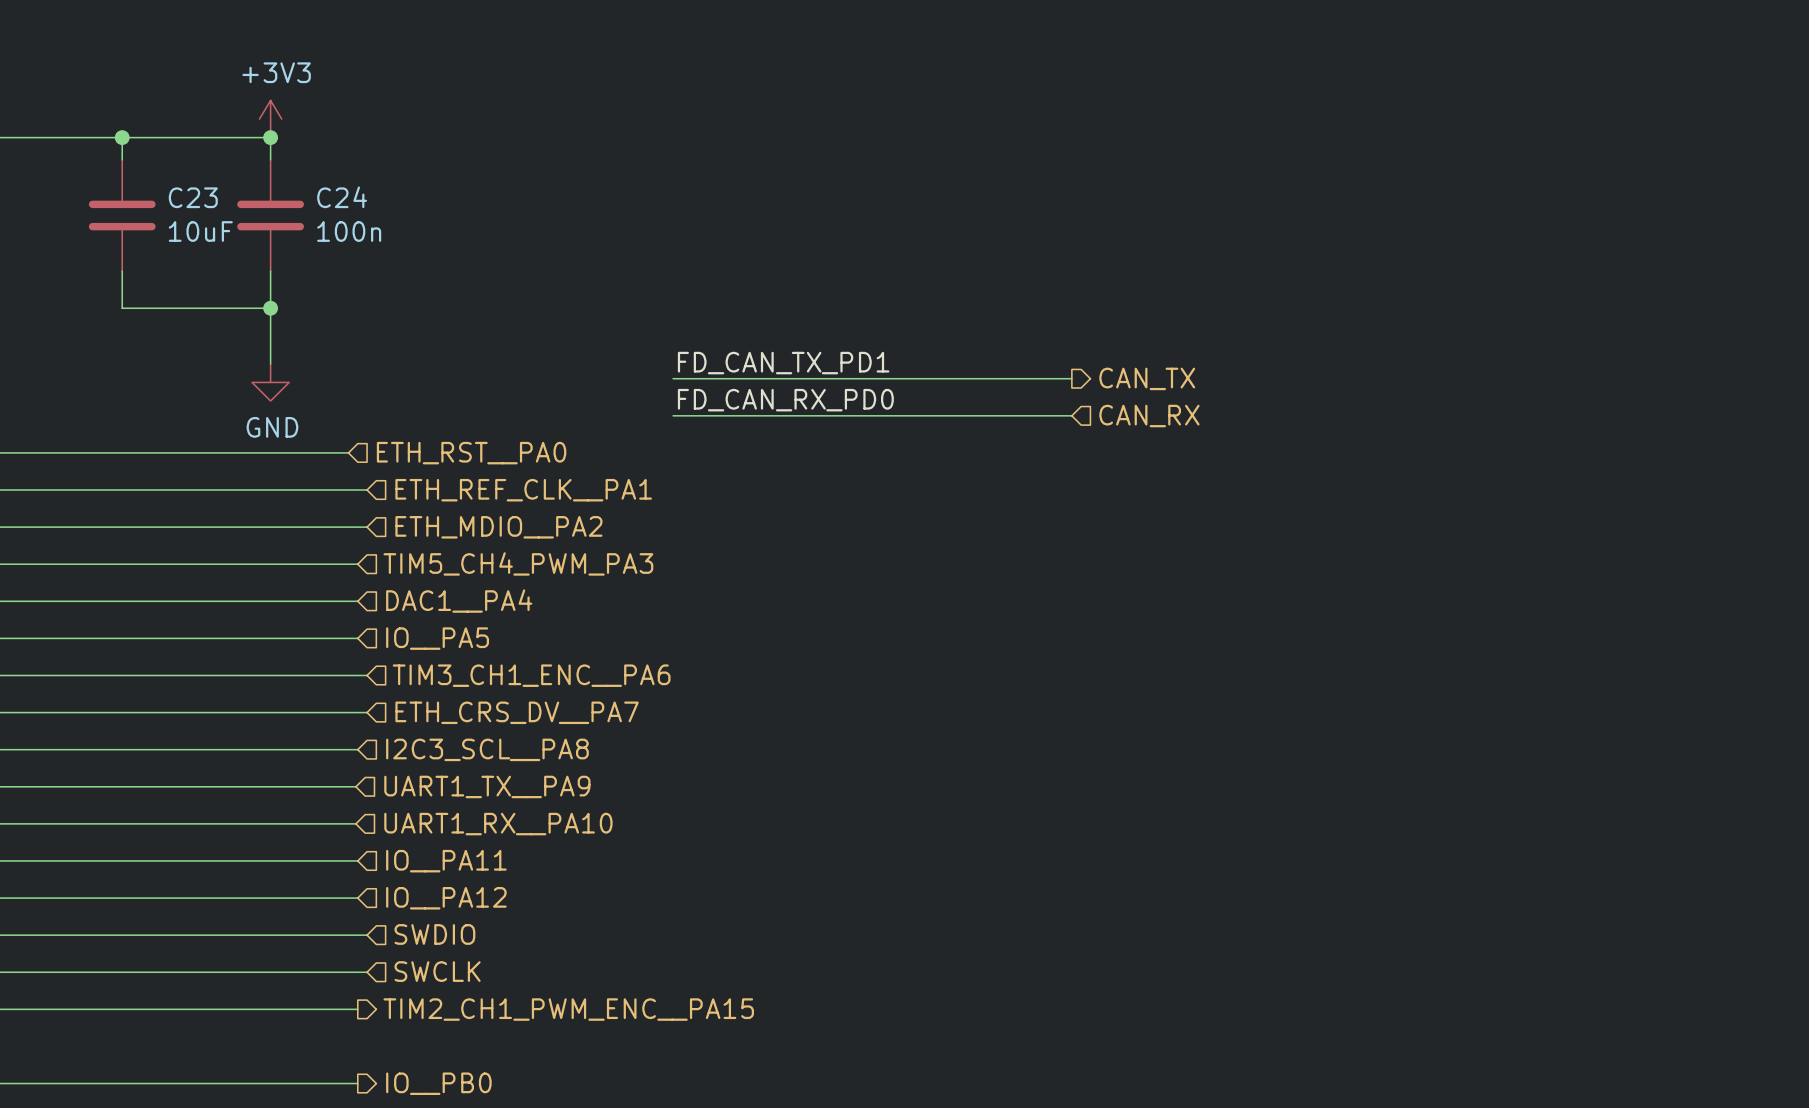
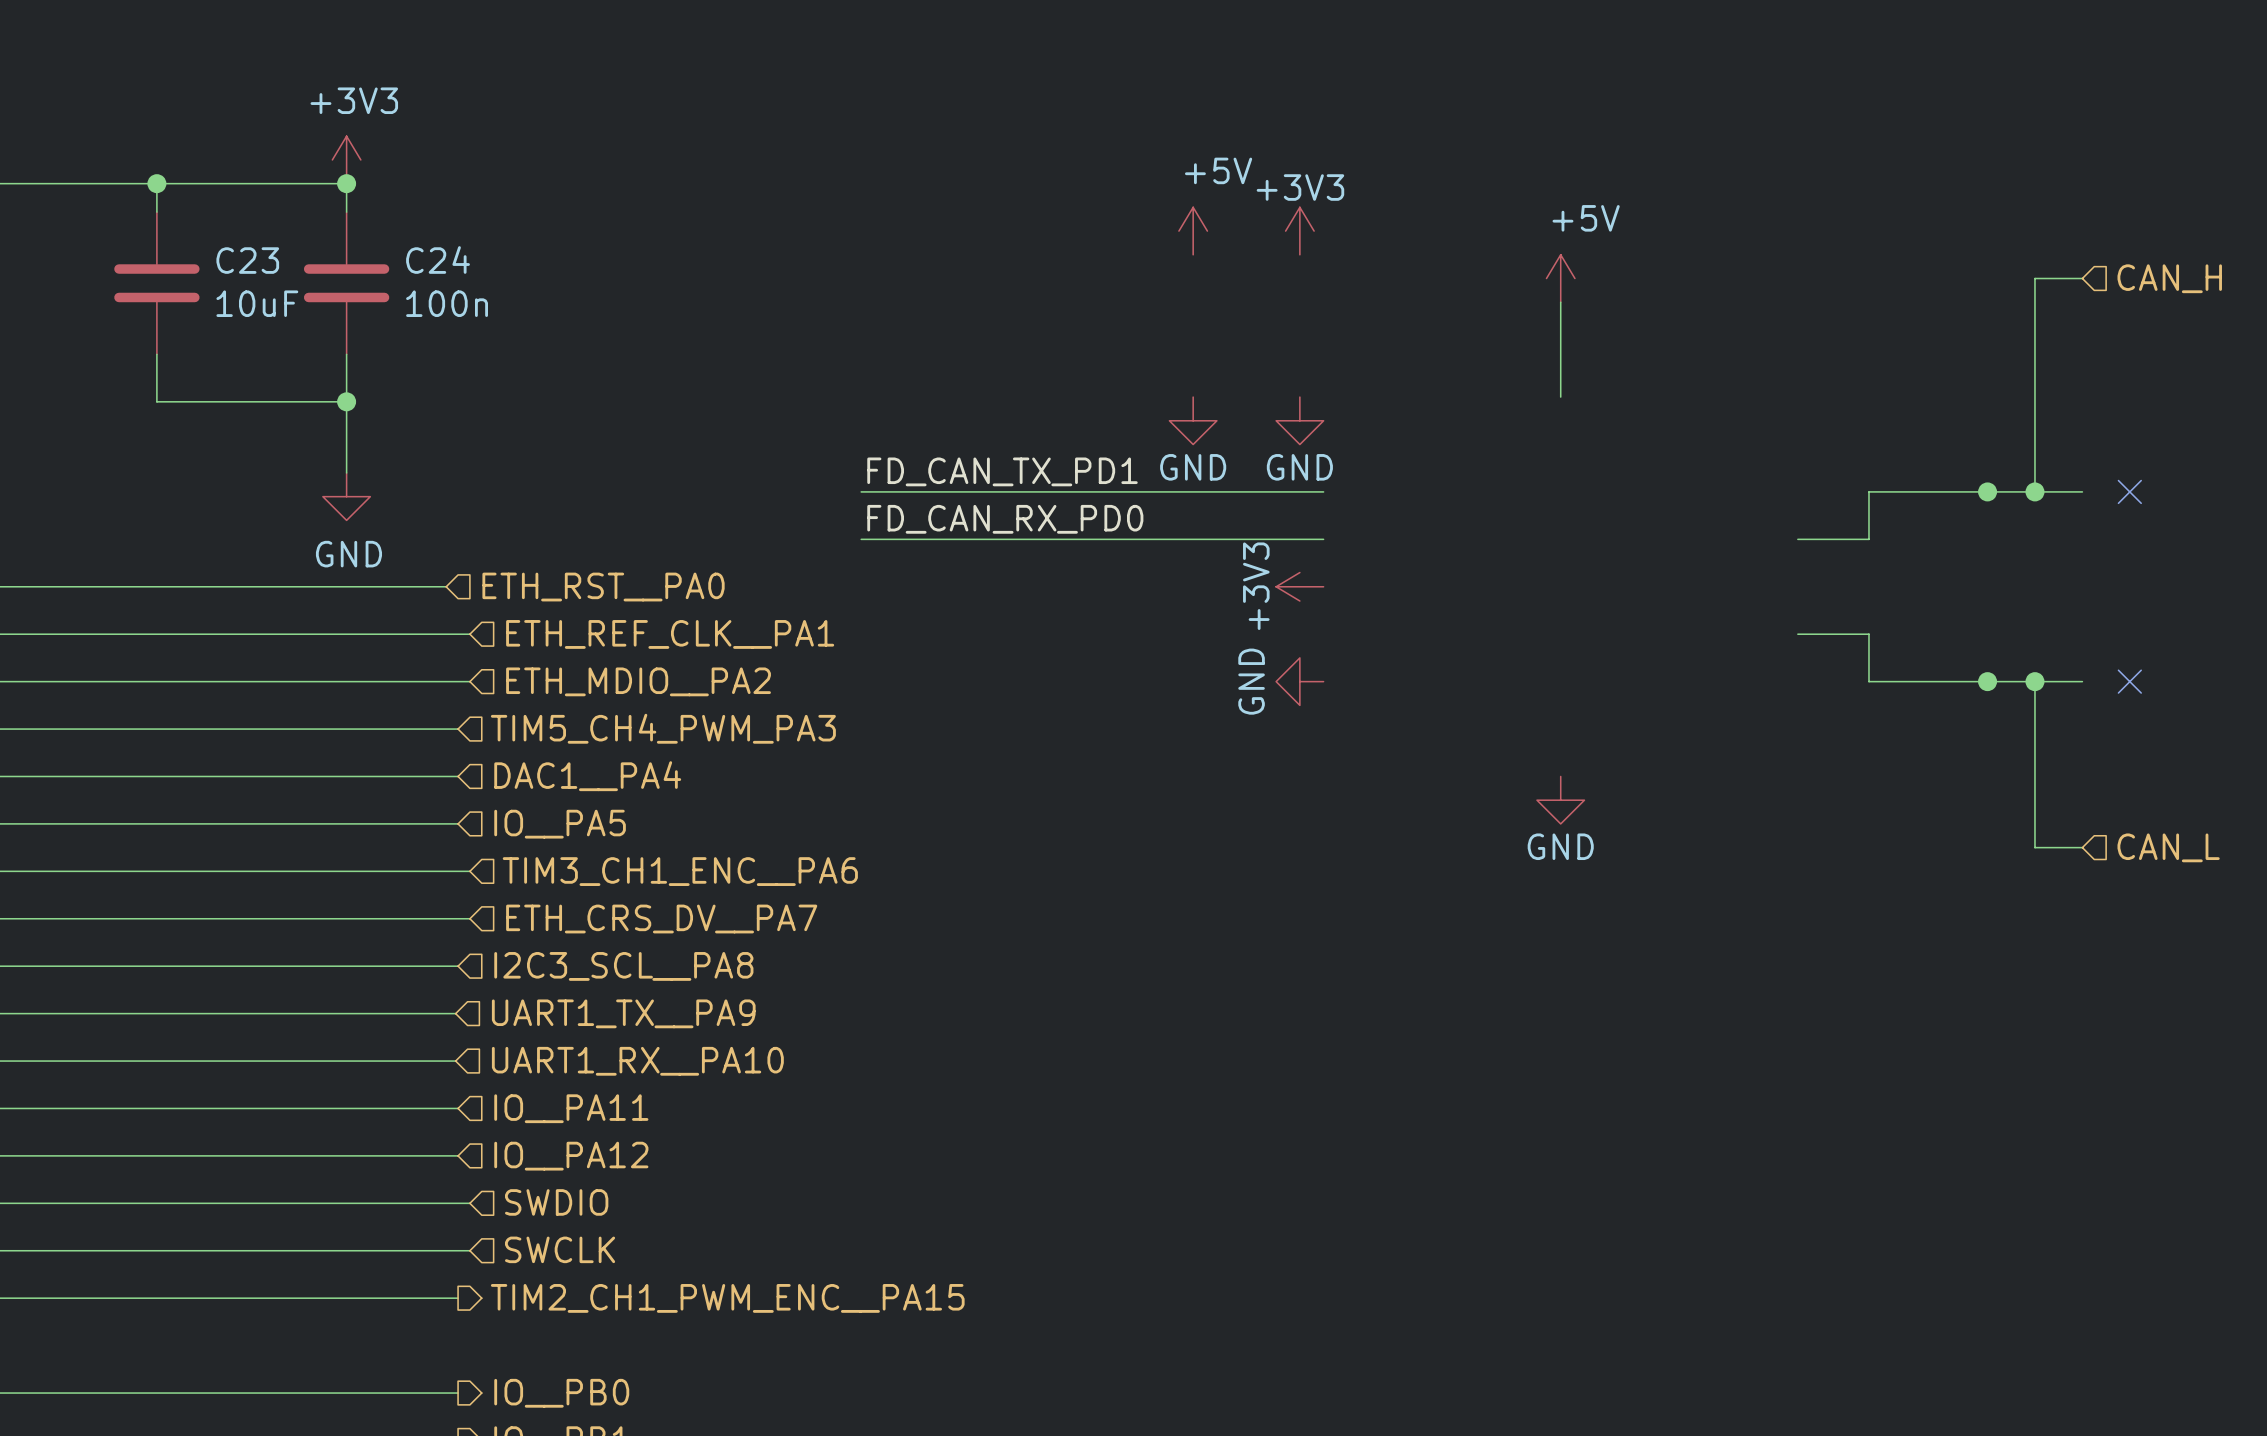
power symbol: none -> +5V (1193, 231)
power symbol: none -> +3V3 (1299, 231)
power symbol: none -> +5V (1560, 278)
wire: none -> (2082, 278) (2034, 278) (2034, 491)
hierarchical label: none -> CAN_H (2169, 278)
wire: none -> (1560, 302) (1560, 397)
power symbol: none -> GND (1193, 420)
power symbol: none -> GND (1299, 420)
wire: (1034, 378) (1071, 378) -> none
hierarchical label: CAN_TX (1147, 378) -> none
junction: none -> (1987, 491)
junction: none -> (2034, 491)
wire: none -> (2082, 491) (1868, 491) (1868, 539) (1797, 539)
no-connect mark: none -> (2129, 491)
wire: (1034, 415) (1071, 415) -> none
hierarchical label: CAN_RX (1149, 416) -> none
power symbol: none -> +3V3 (1299, 586)
wire: none -> (1797, 634) (1868, 634) (1868, 681) (2082, 681)
power symbol: none -> GND (1299, 681)
junction: none -> (1987, 681)
wire: none -> (2034, 681) (2034, 847) (2082, 847)
junction: none -> (2034, 681)
no-connect mark: none -> (2129, 681)
power symbol: none -> GND (1560, 800)
hierarchical label: none -> CAN_L (2168, 847)

